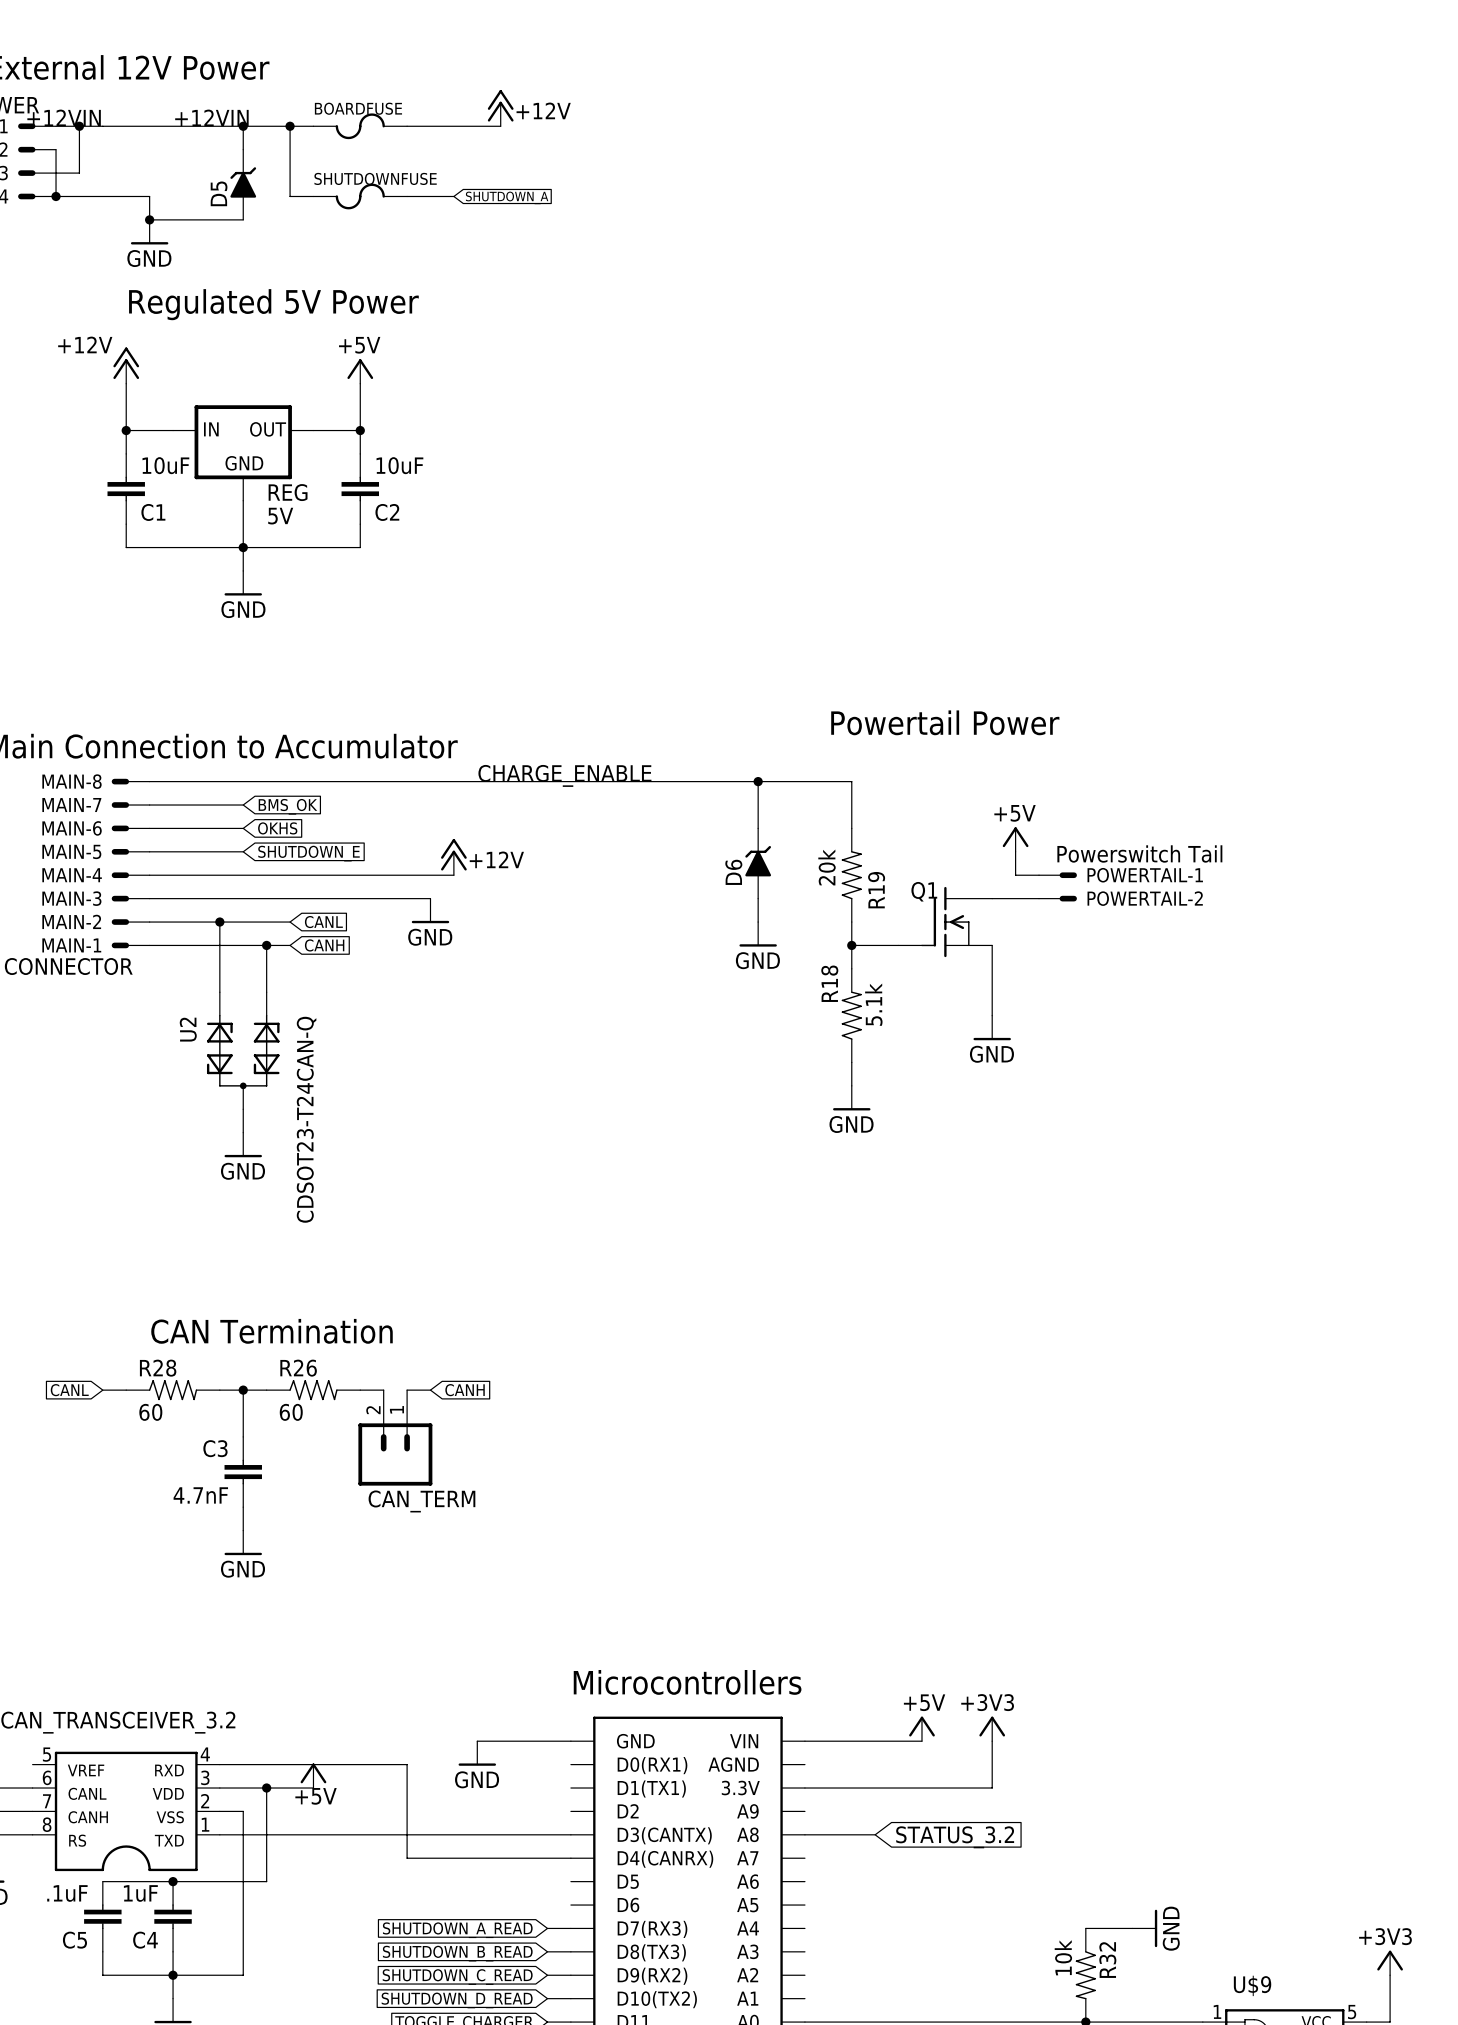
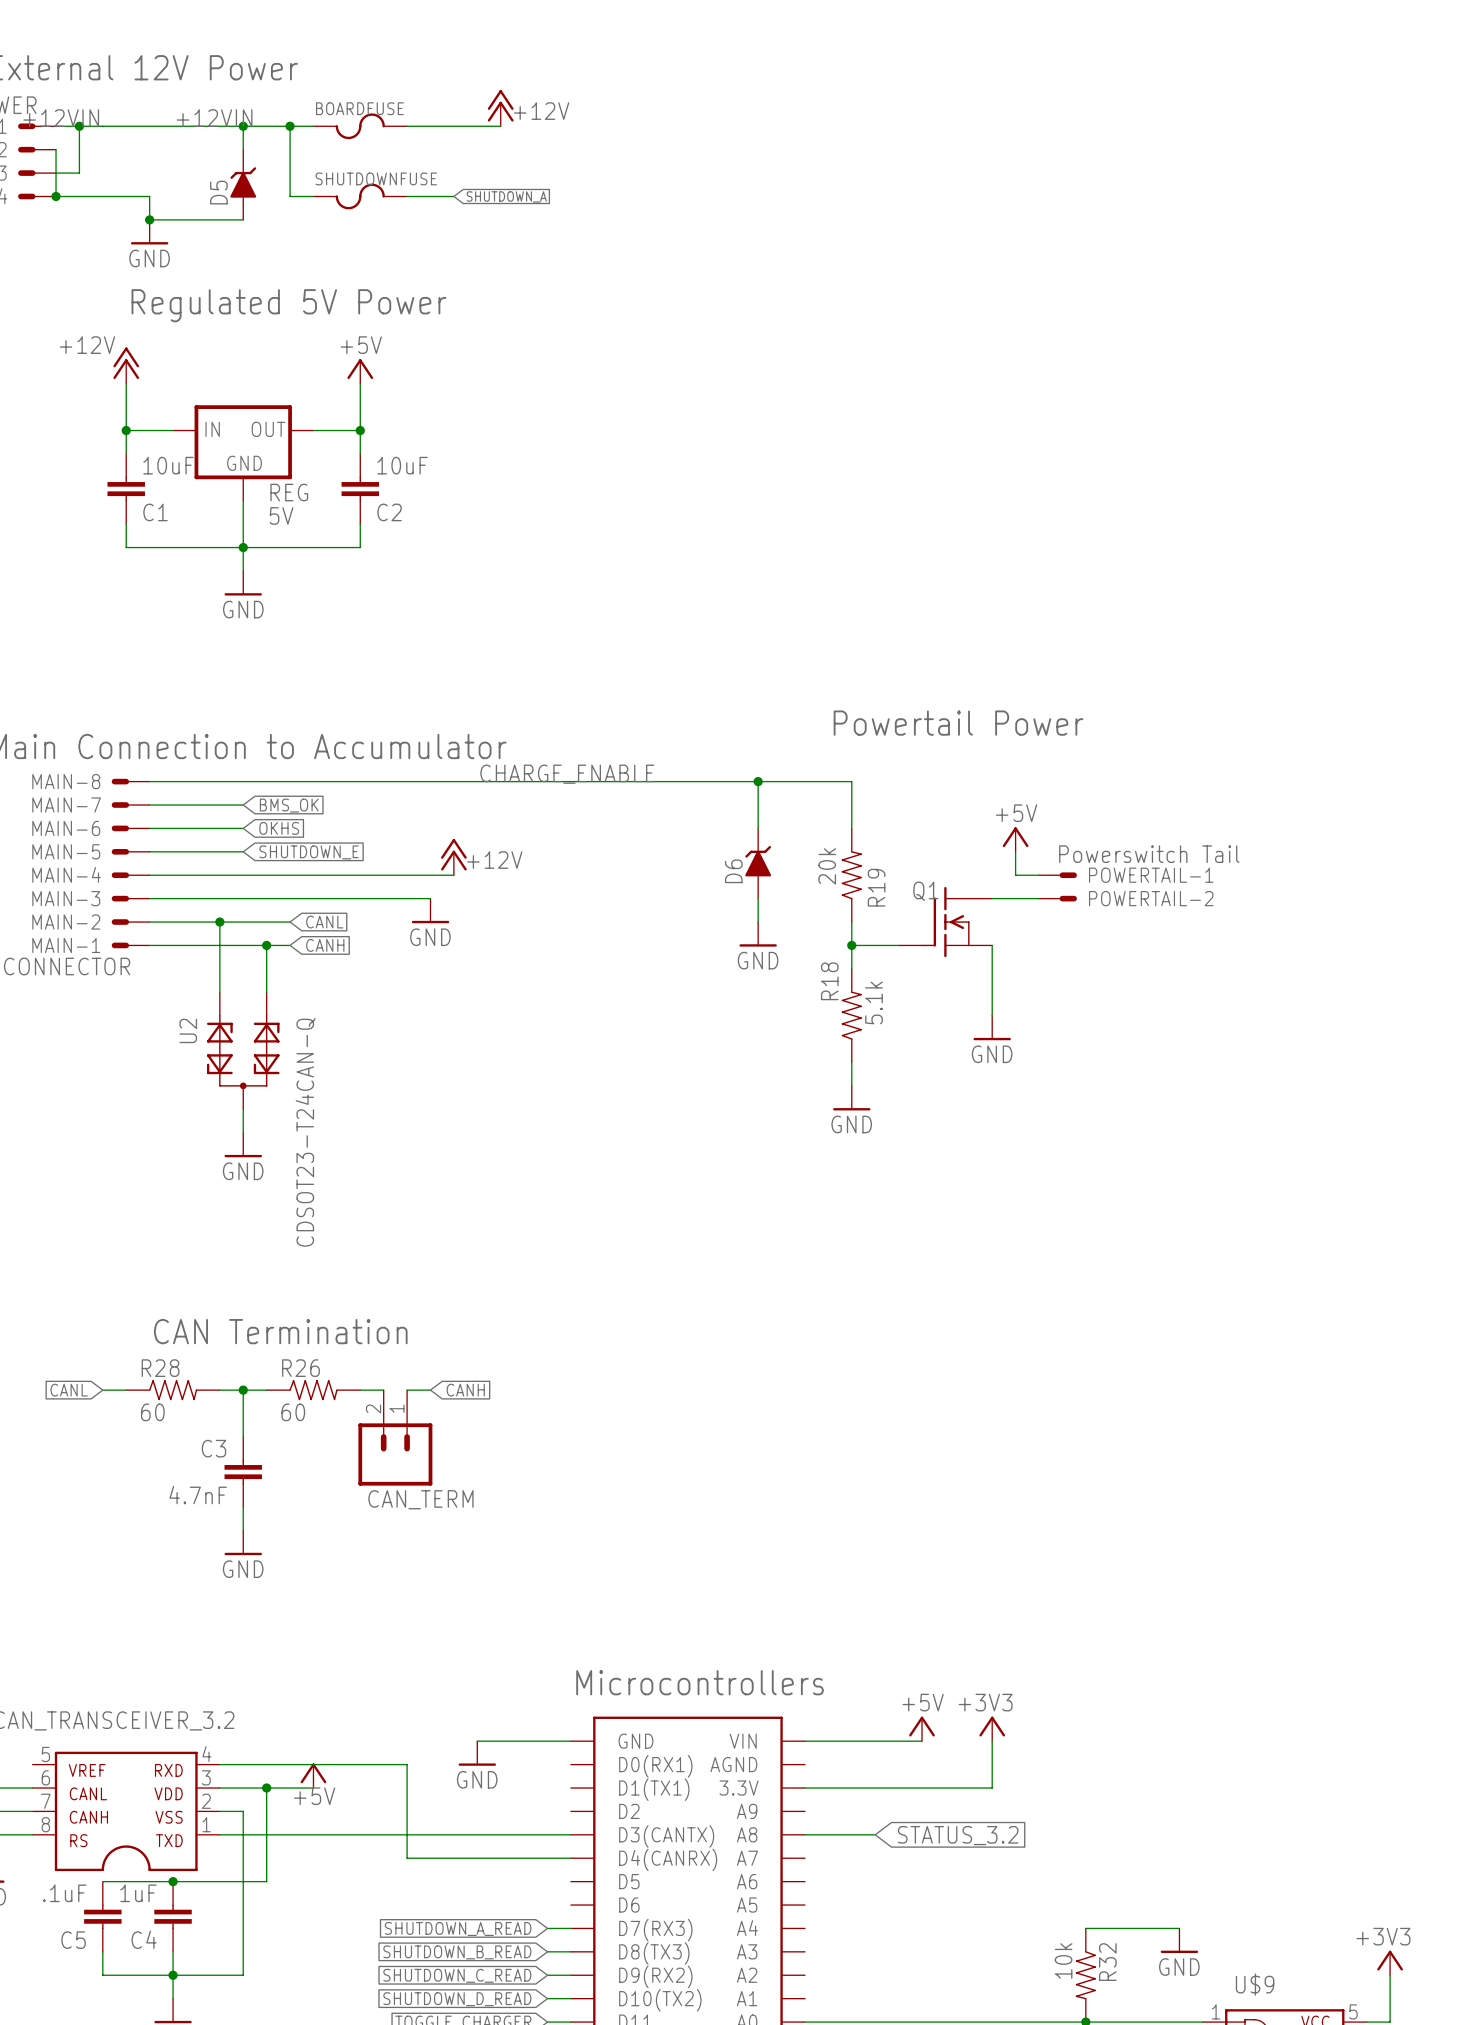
power symbol position: GND (1144, 1928) -> GND (1179, 1940)
power symbol rotation: 0° (1156, 1928) -> 90° clockwise (1179, 1951)

